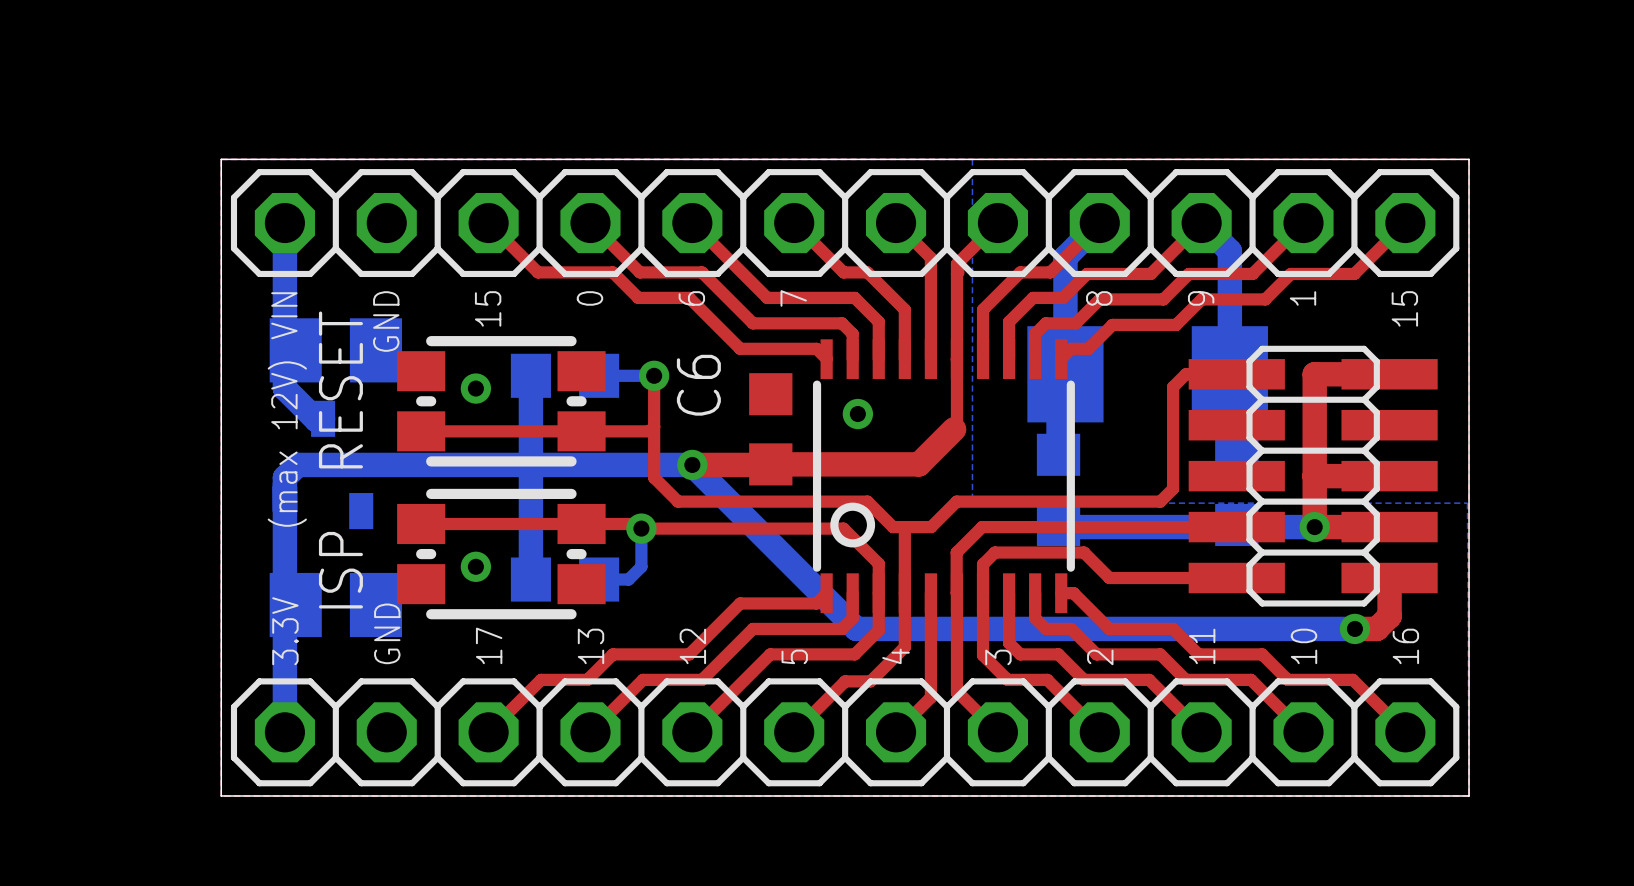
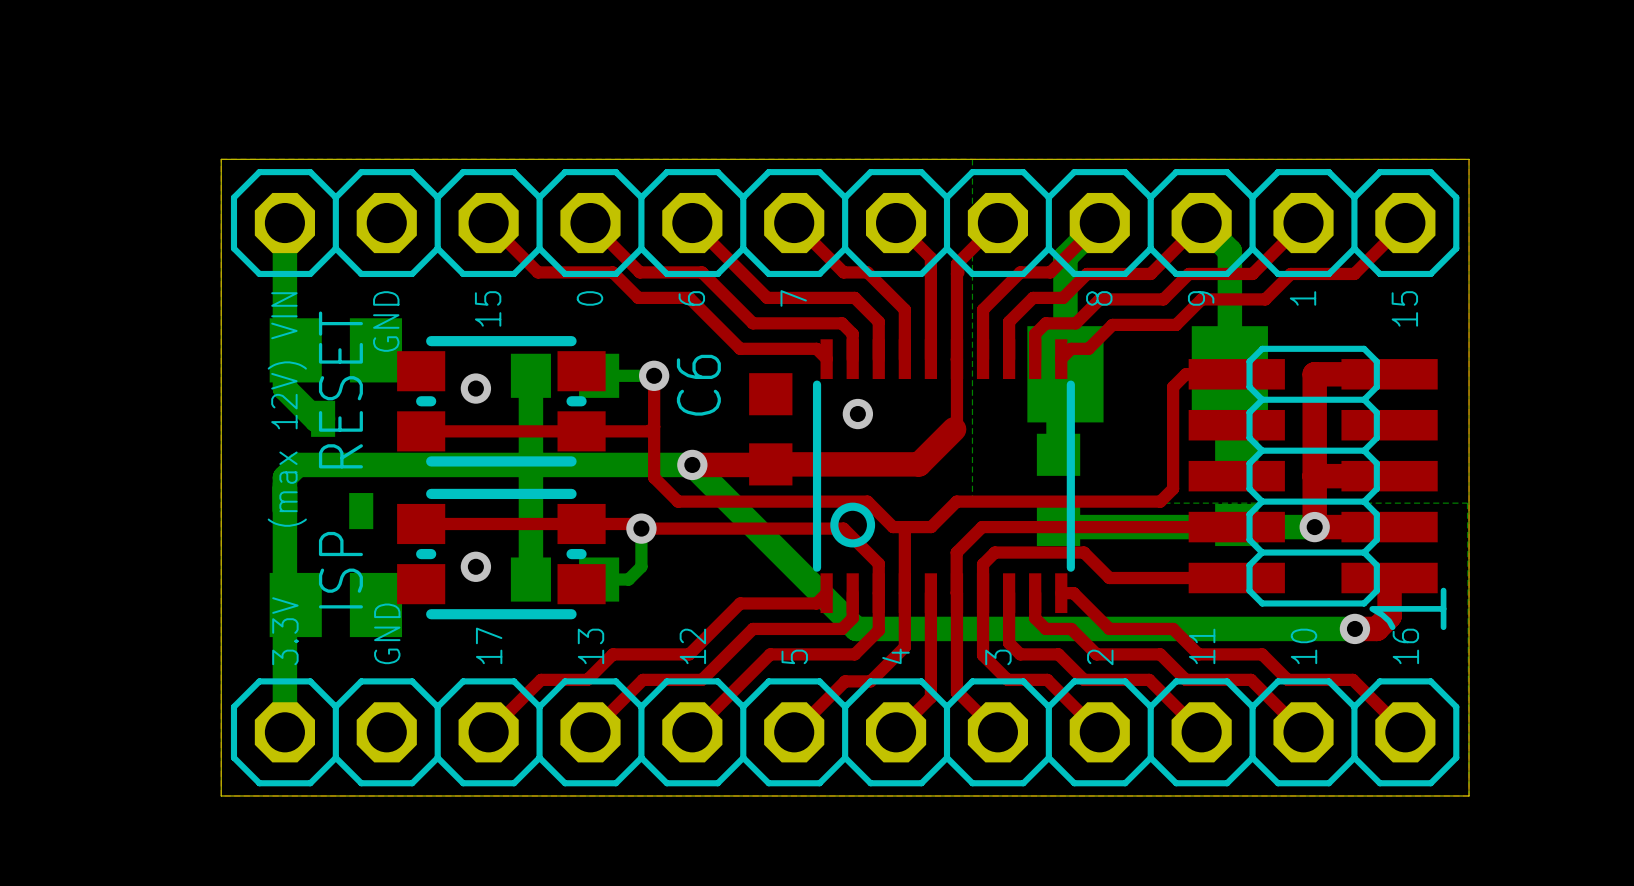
text: none -> 1 (1407, 608)

